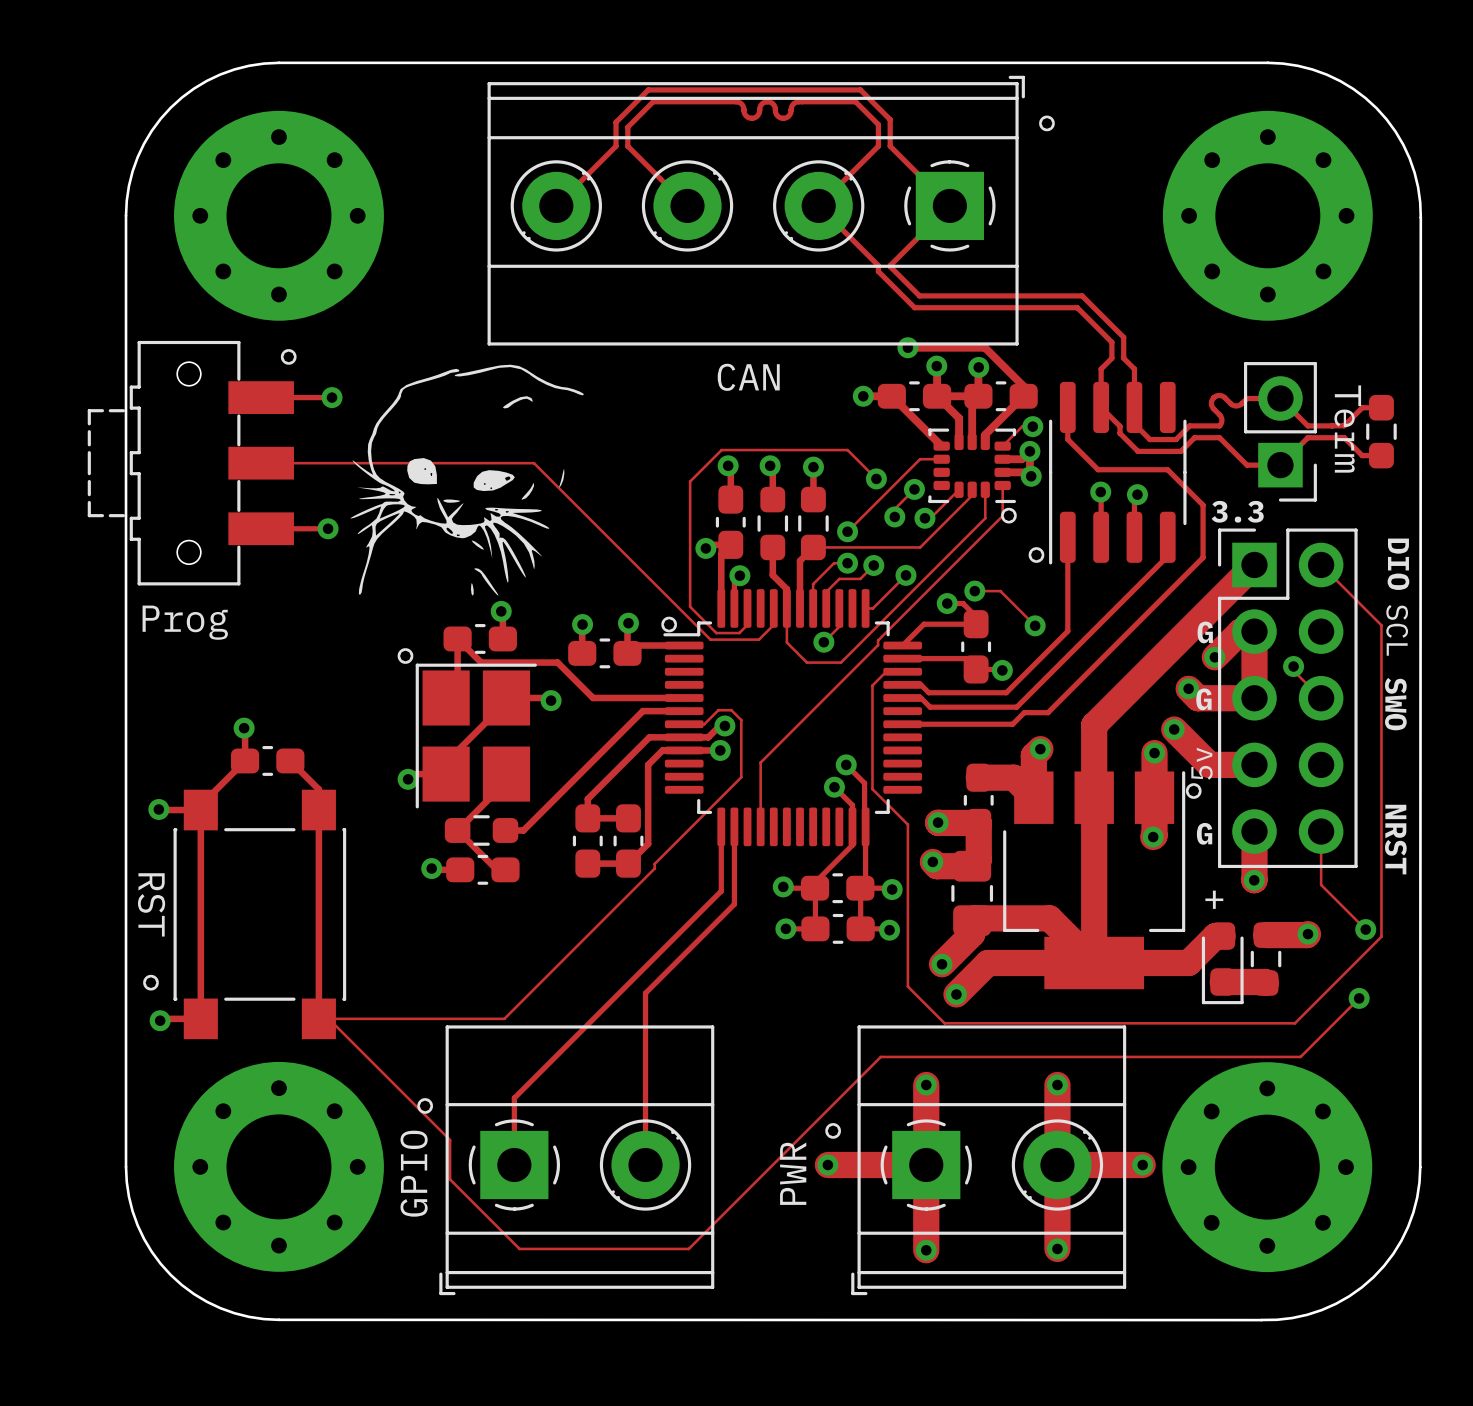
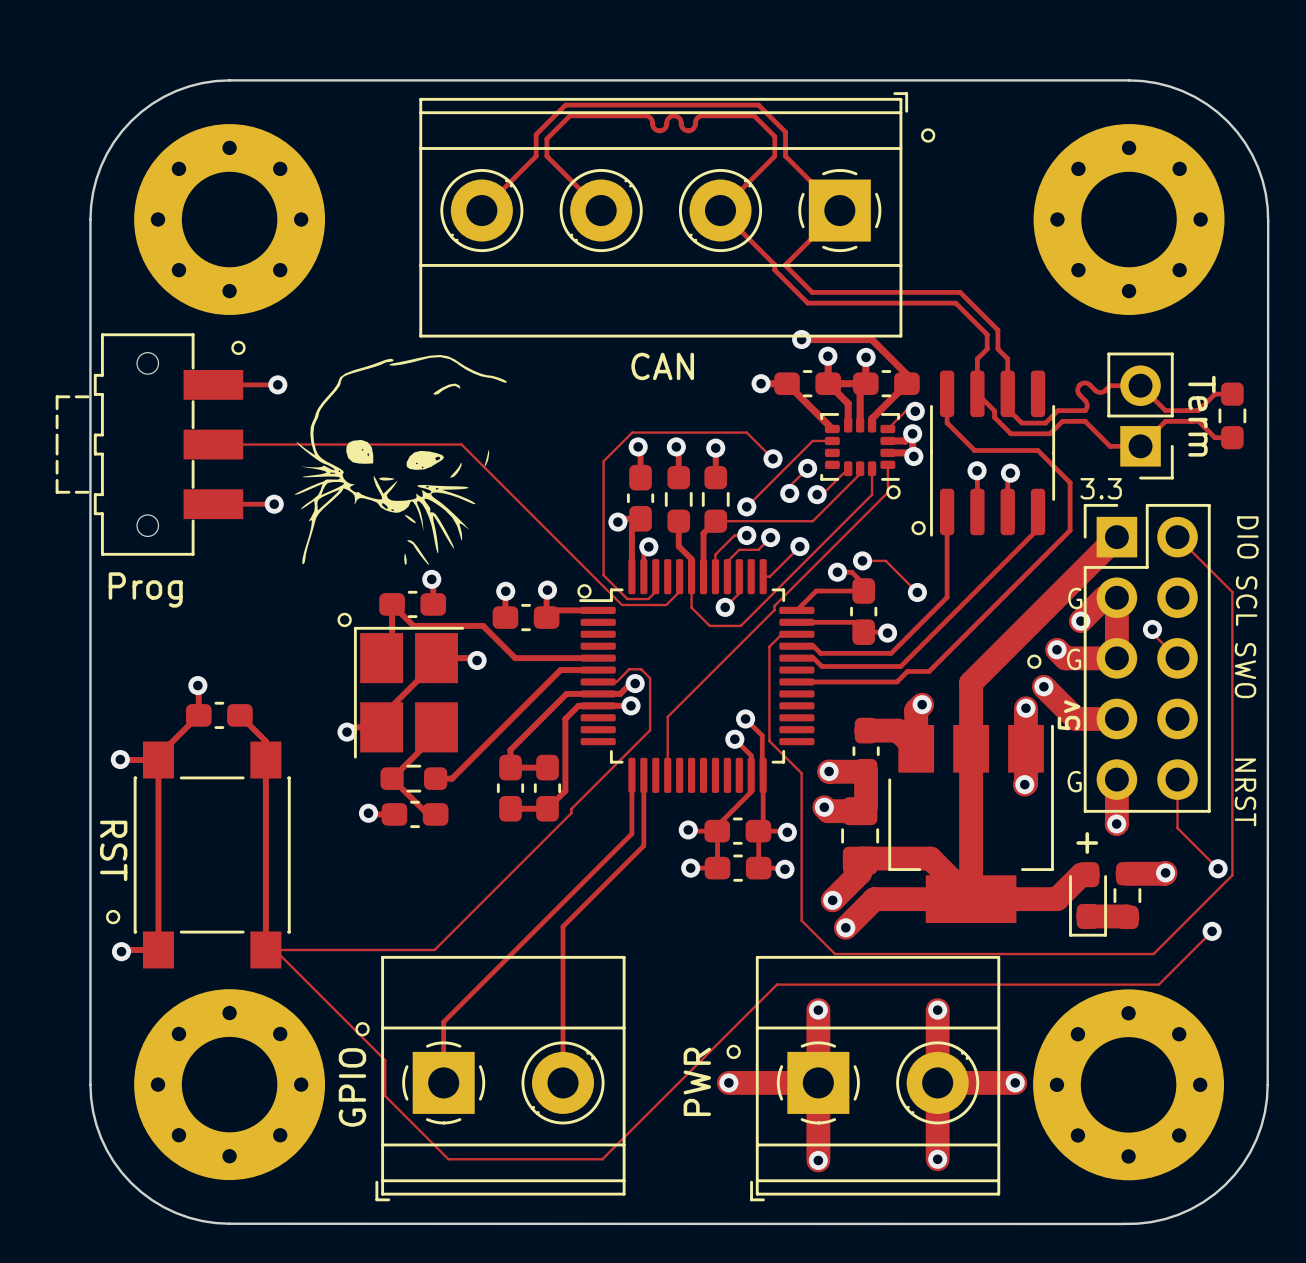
drawing position: (1193, 791) -> (1034, 661)

